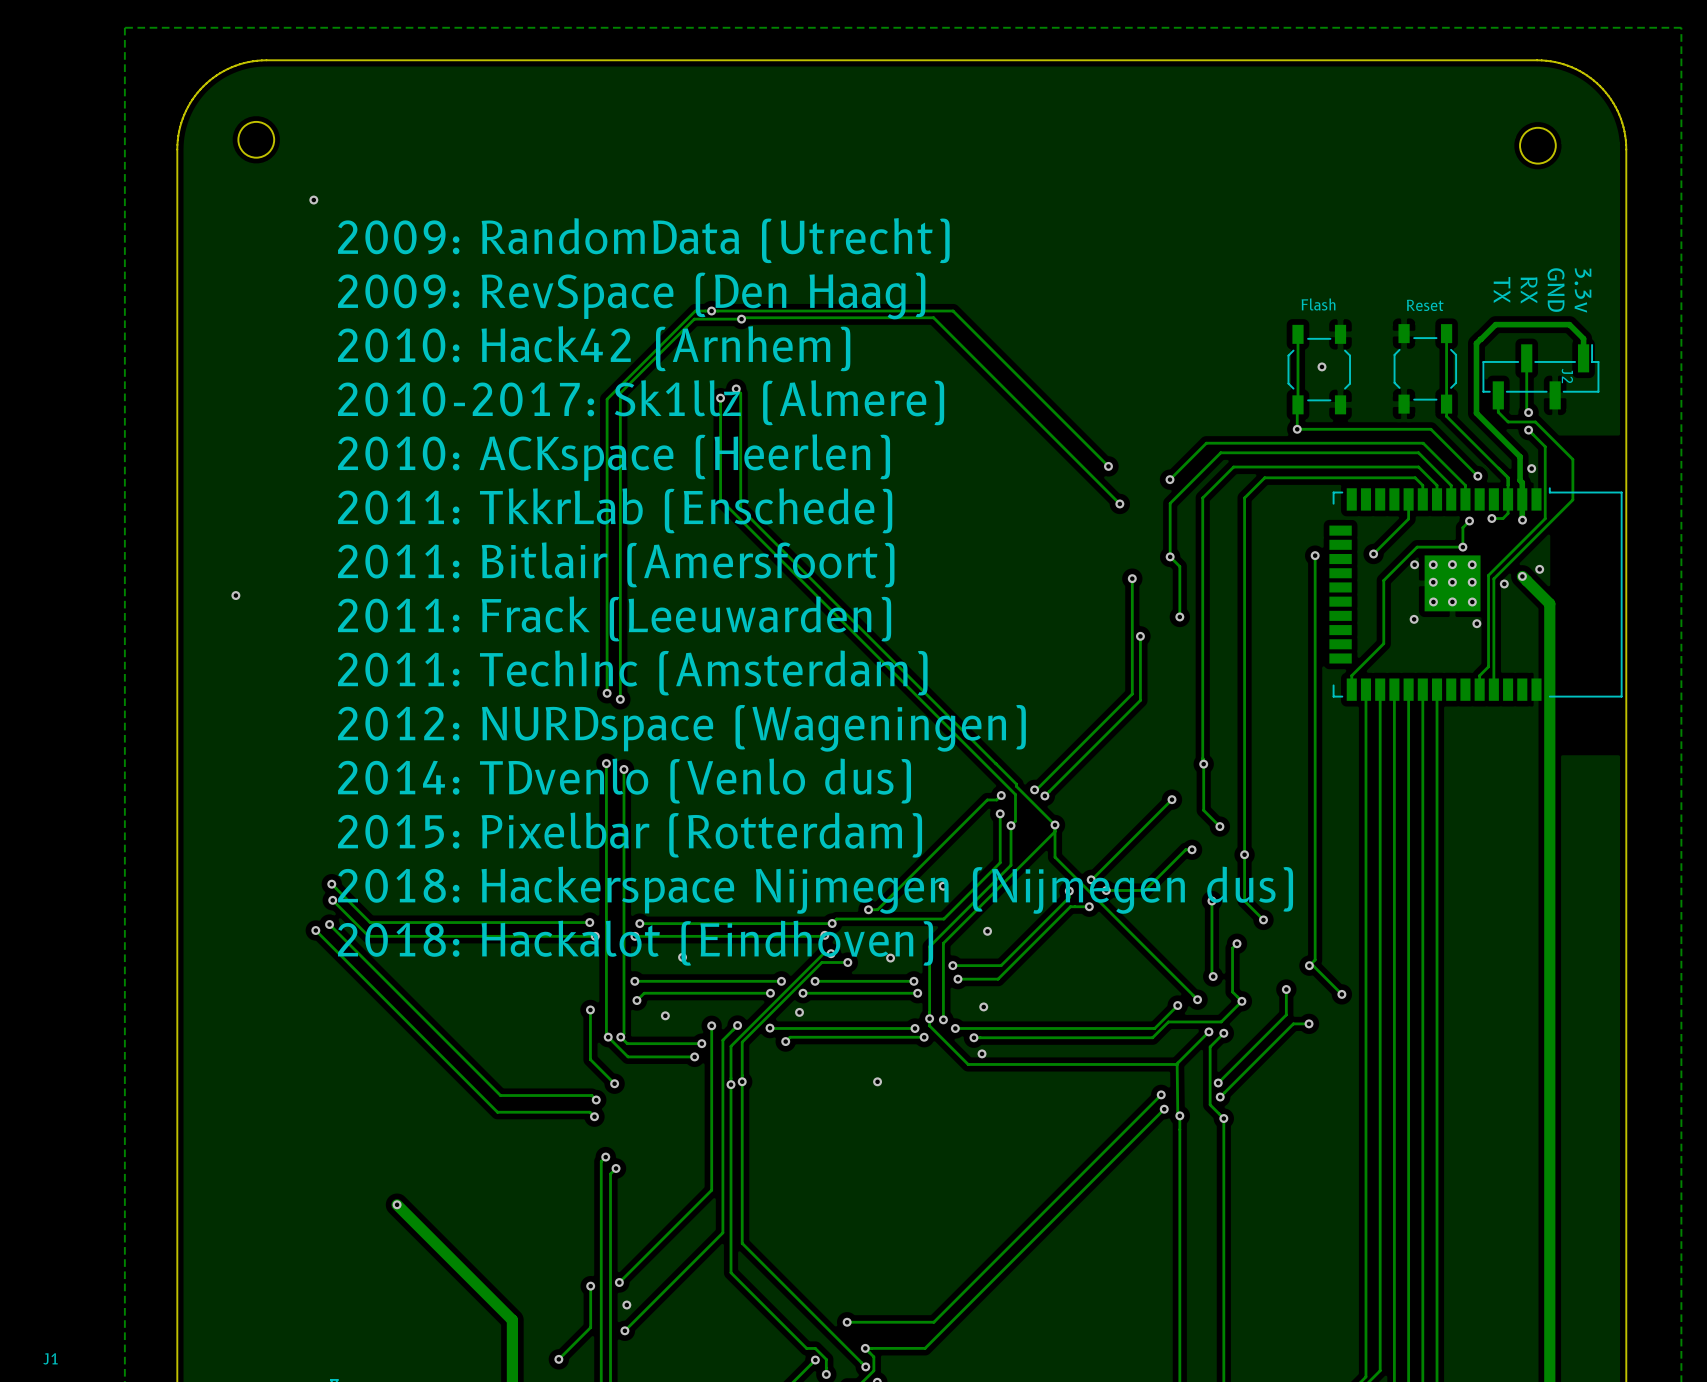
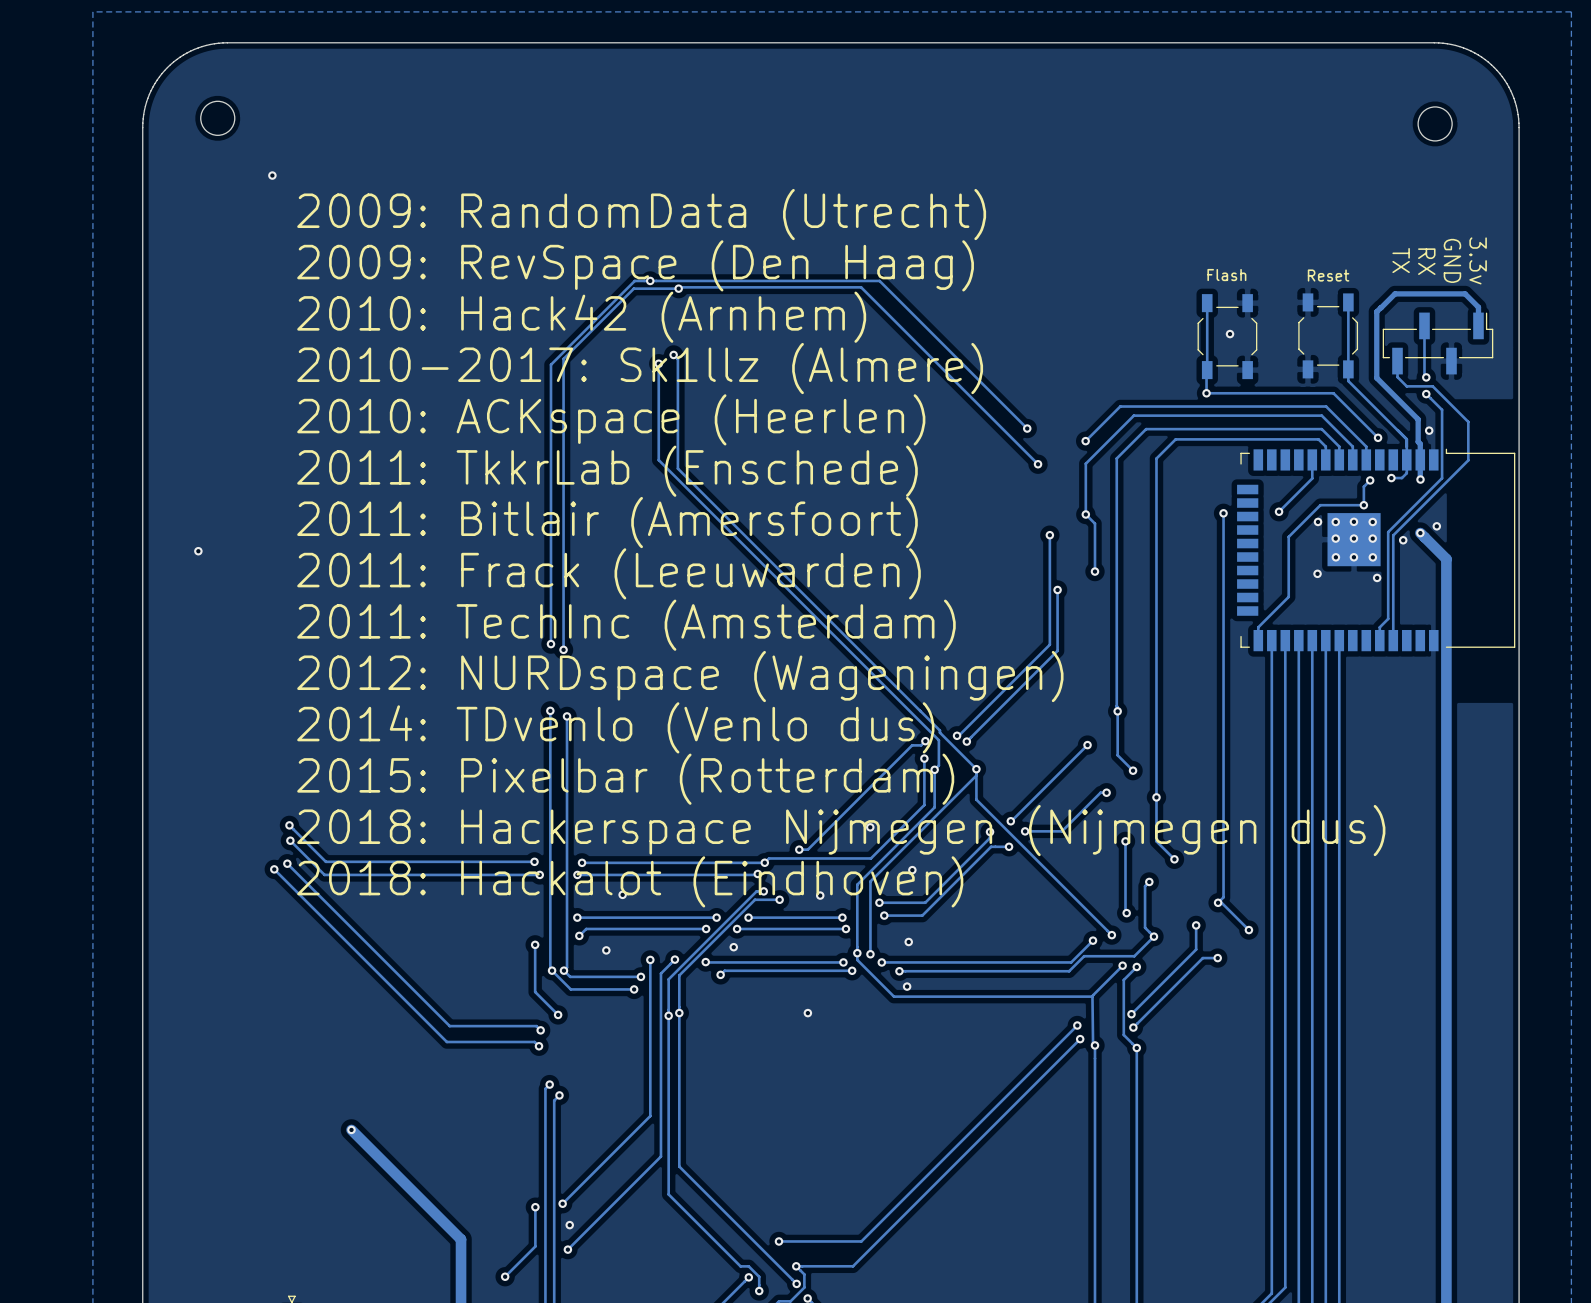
J2 name: J2 (1567, 375) -> none
J1 name: J1 (50, 1358) -> none

